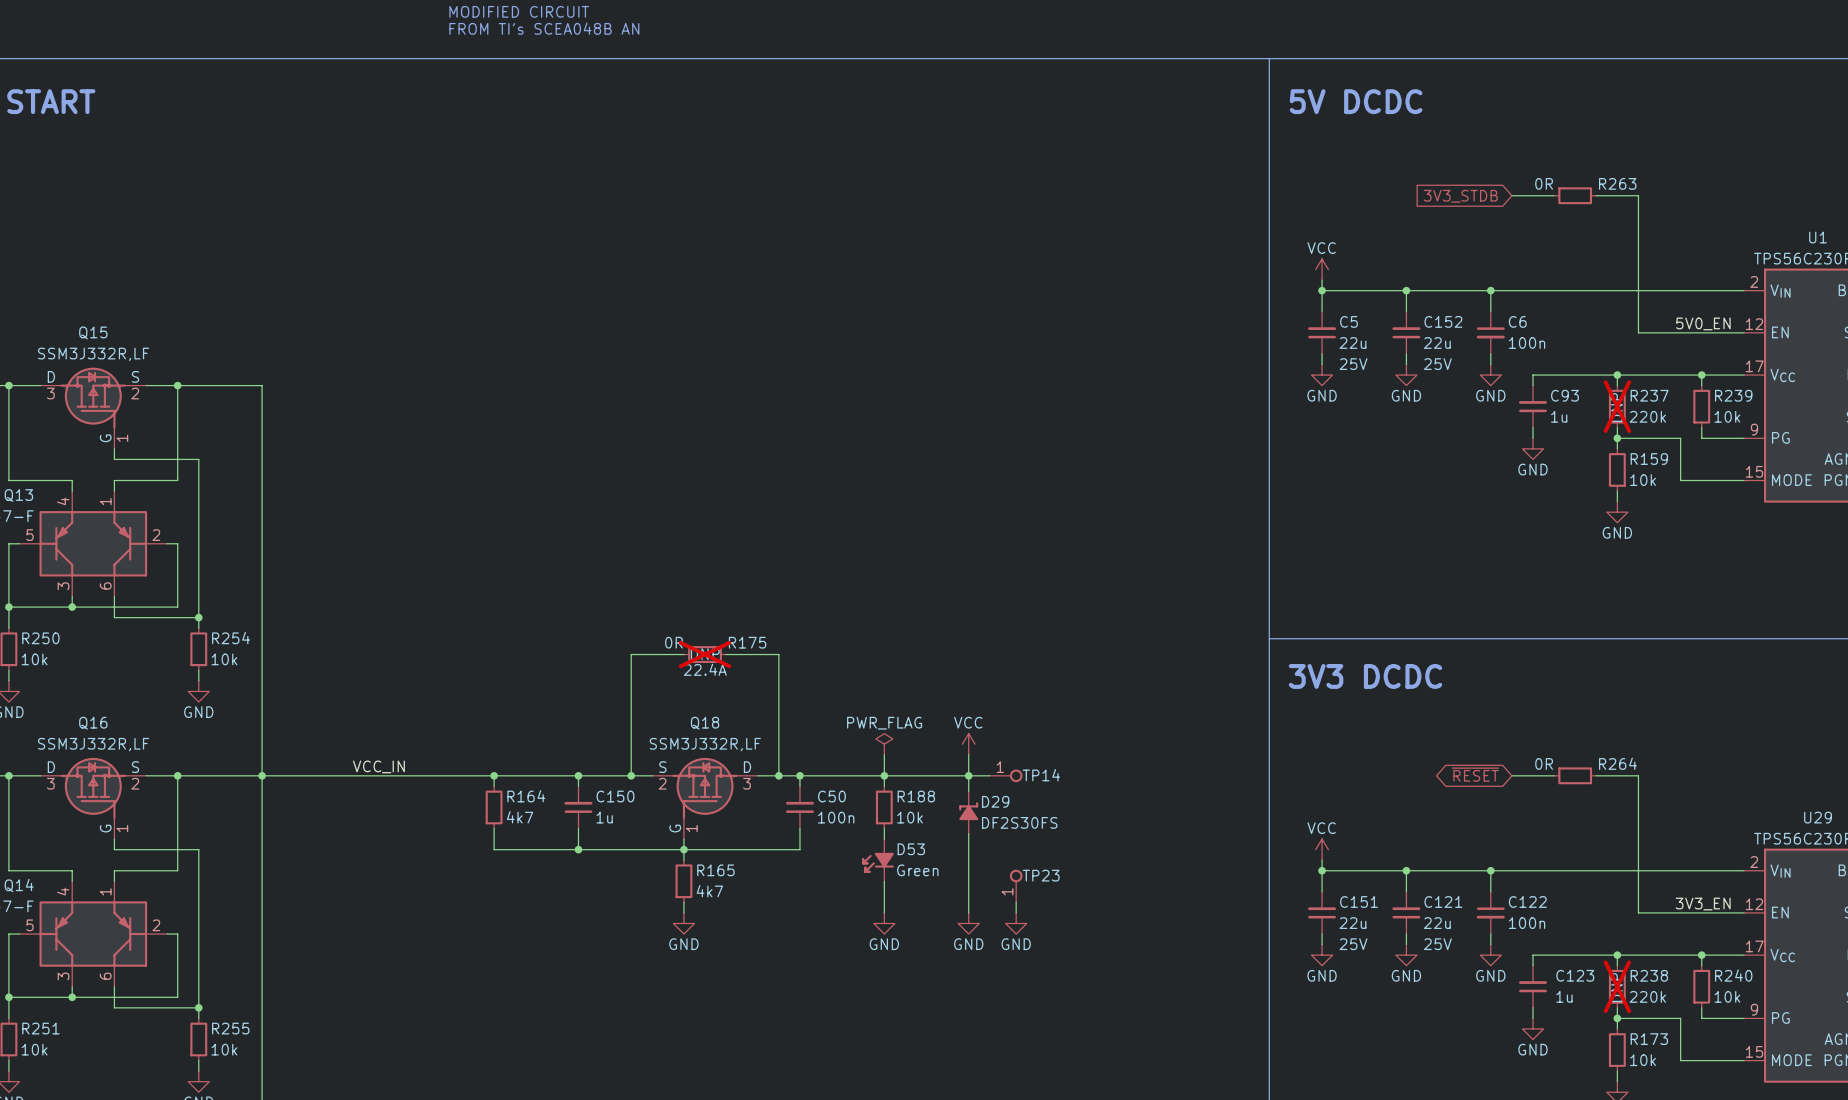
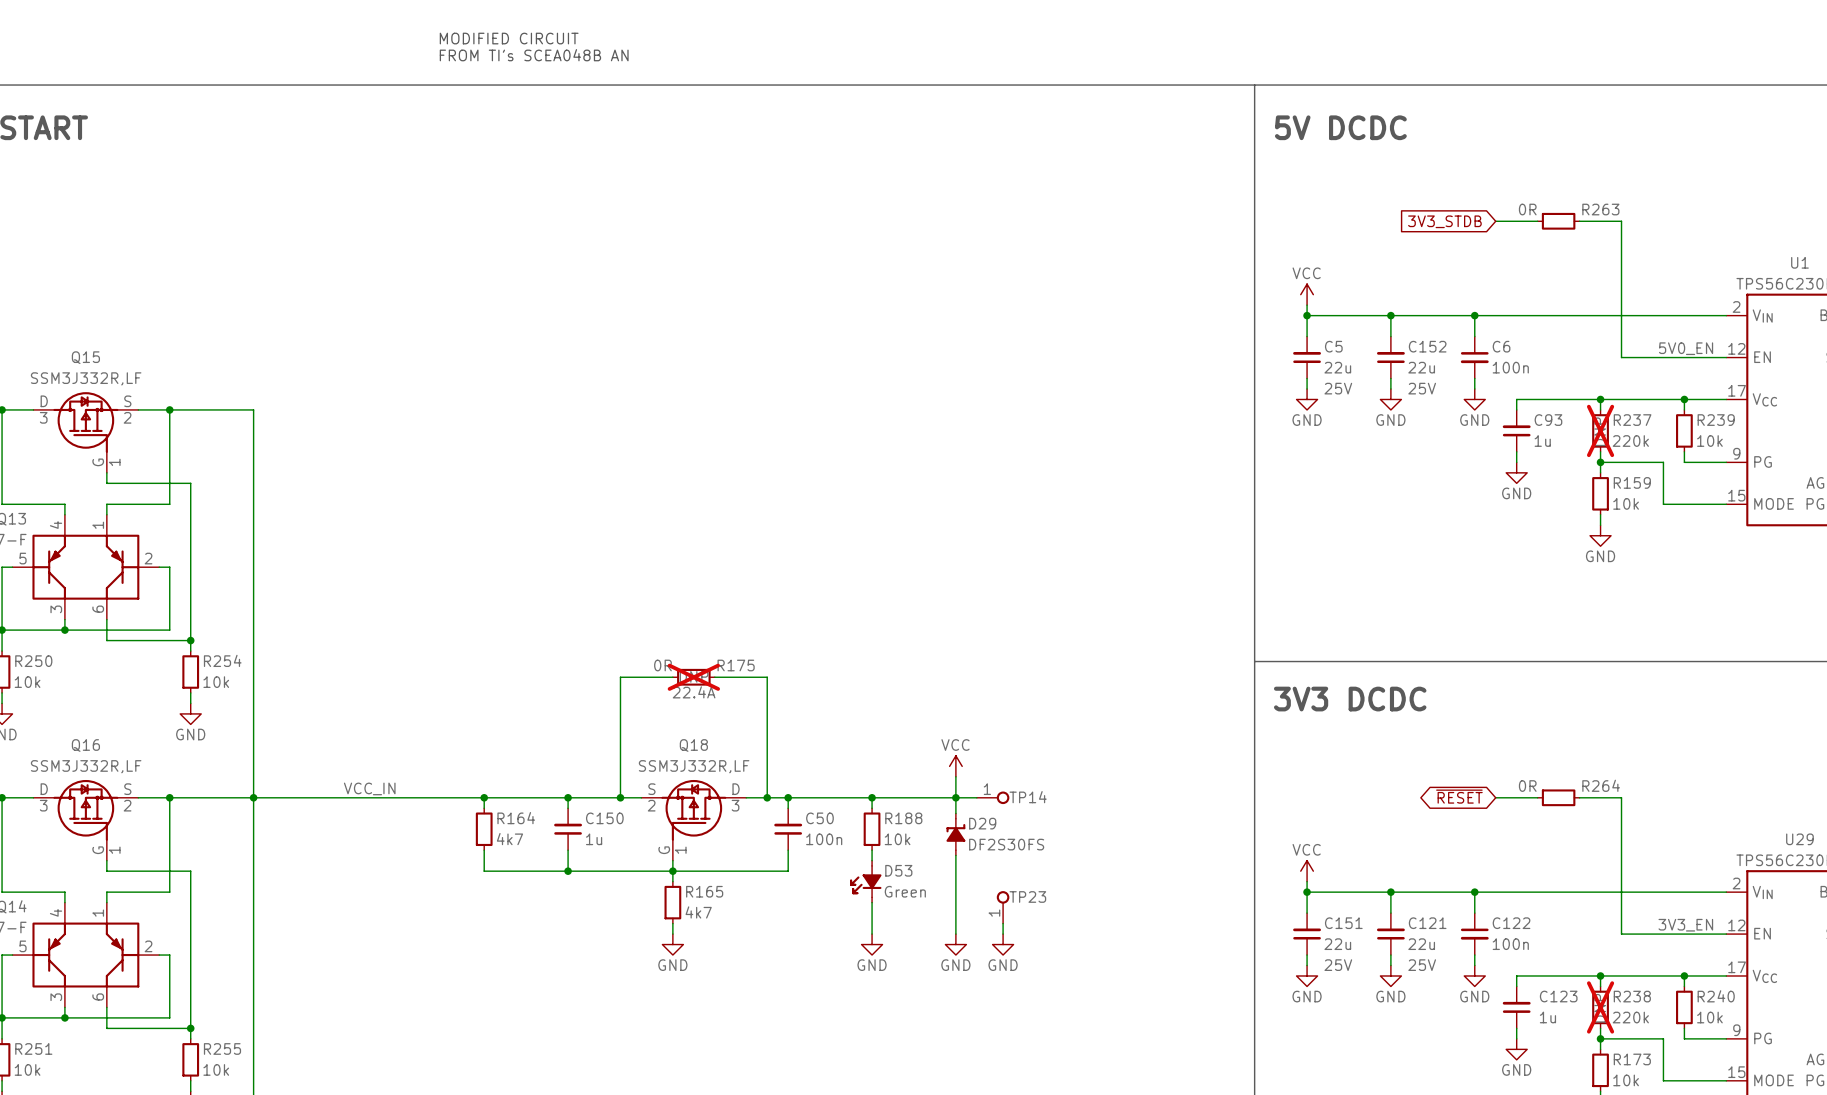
power symbol: PWR_FLAG (884, 744) -> none
wire: (884, 754) (884, 775) -> none

